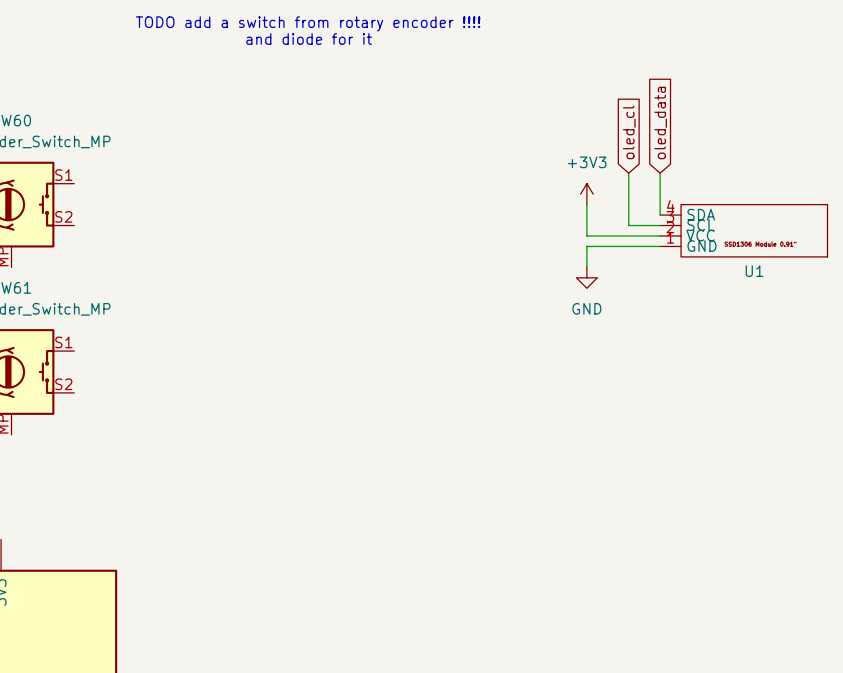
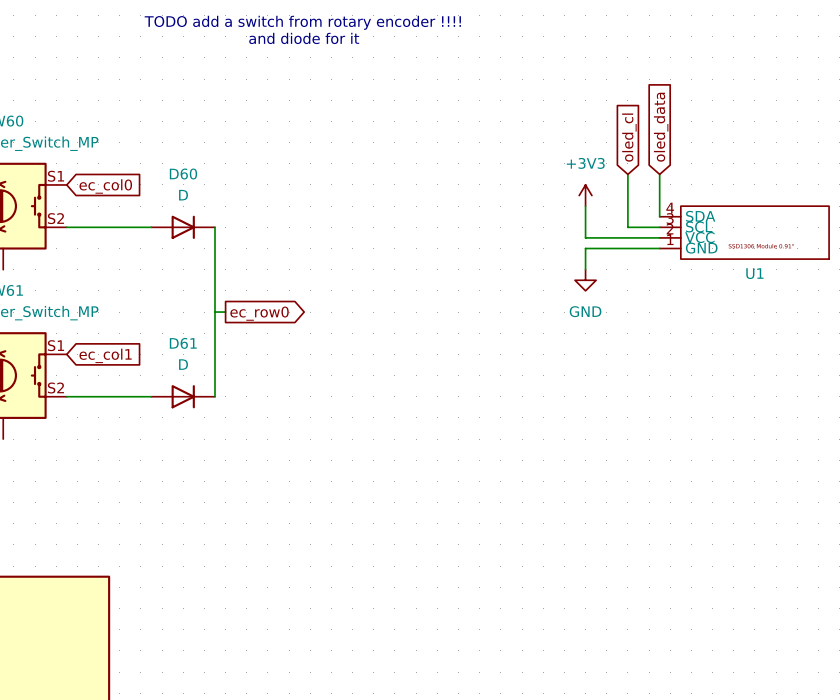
global label: none -> ec_col0 (105, 186)
wire: none -> (66, 227) (151, 227)
D60: none -> D (183, 227)
wire: none -> (215, 227) (215, 396)
wire: none -> (215, 312) (225, 312)
global label: none -> ec_row0 (259, 313)
global label: none -> ec_col1 (105, 355)
wire: none -> (66, 396) (151, 396)
D61: none -> D (183, 396)

